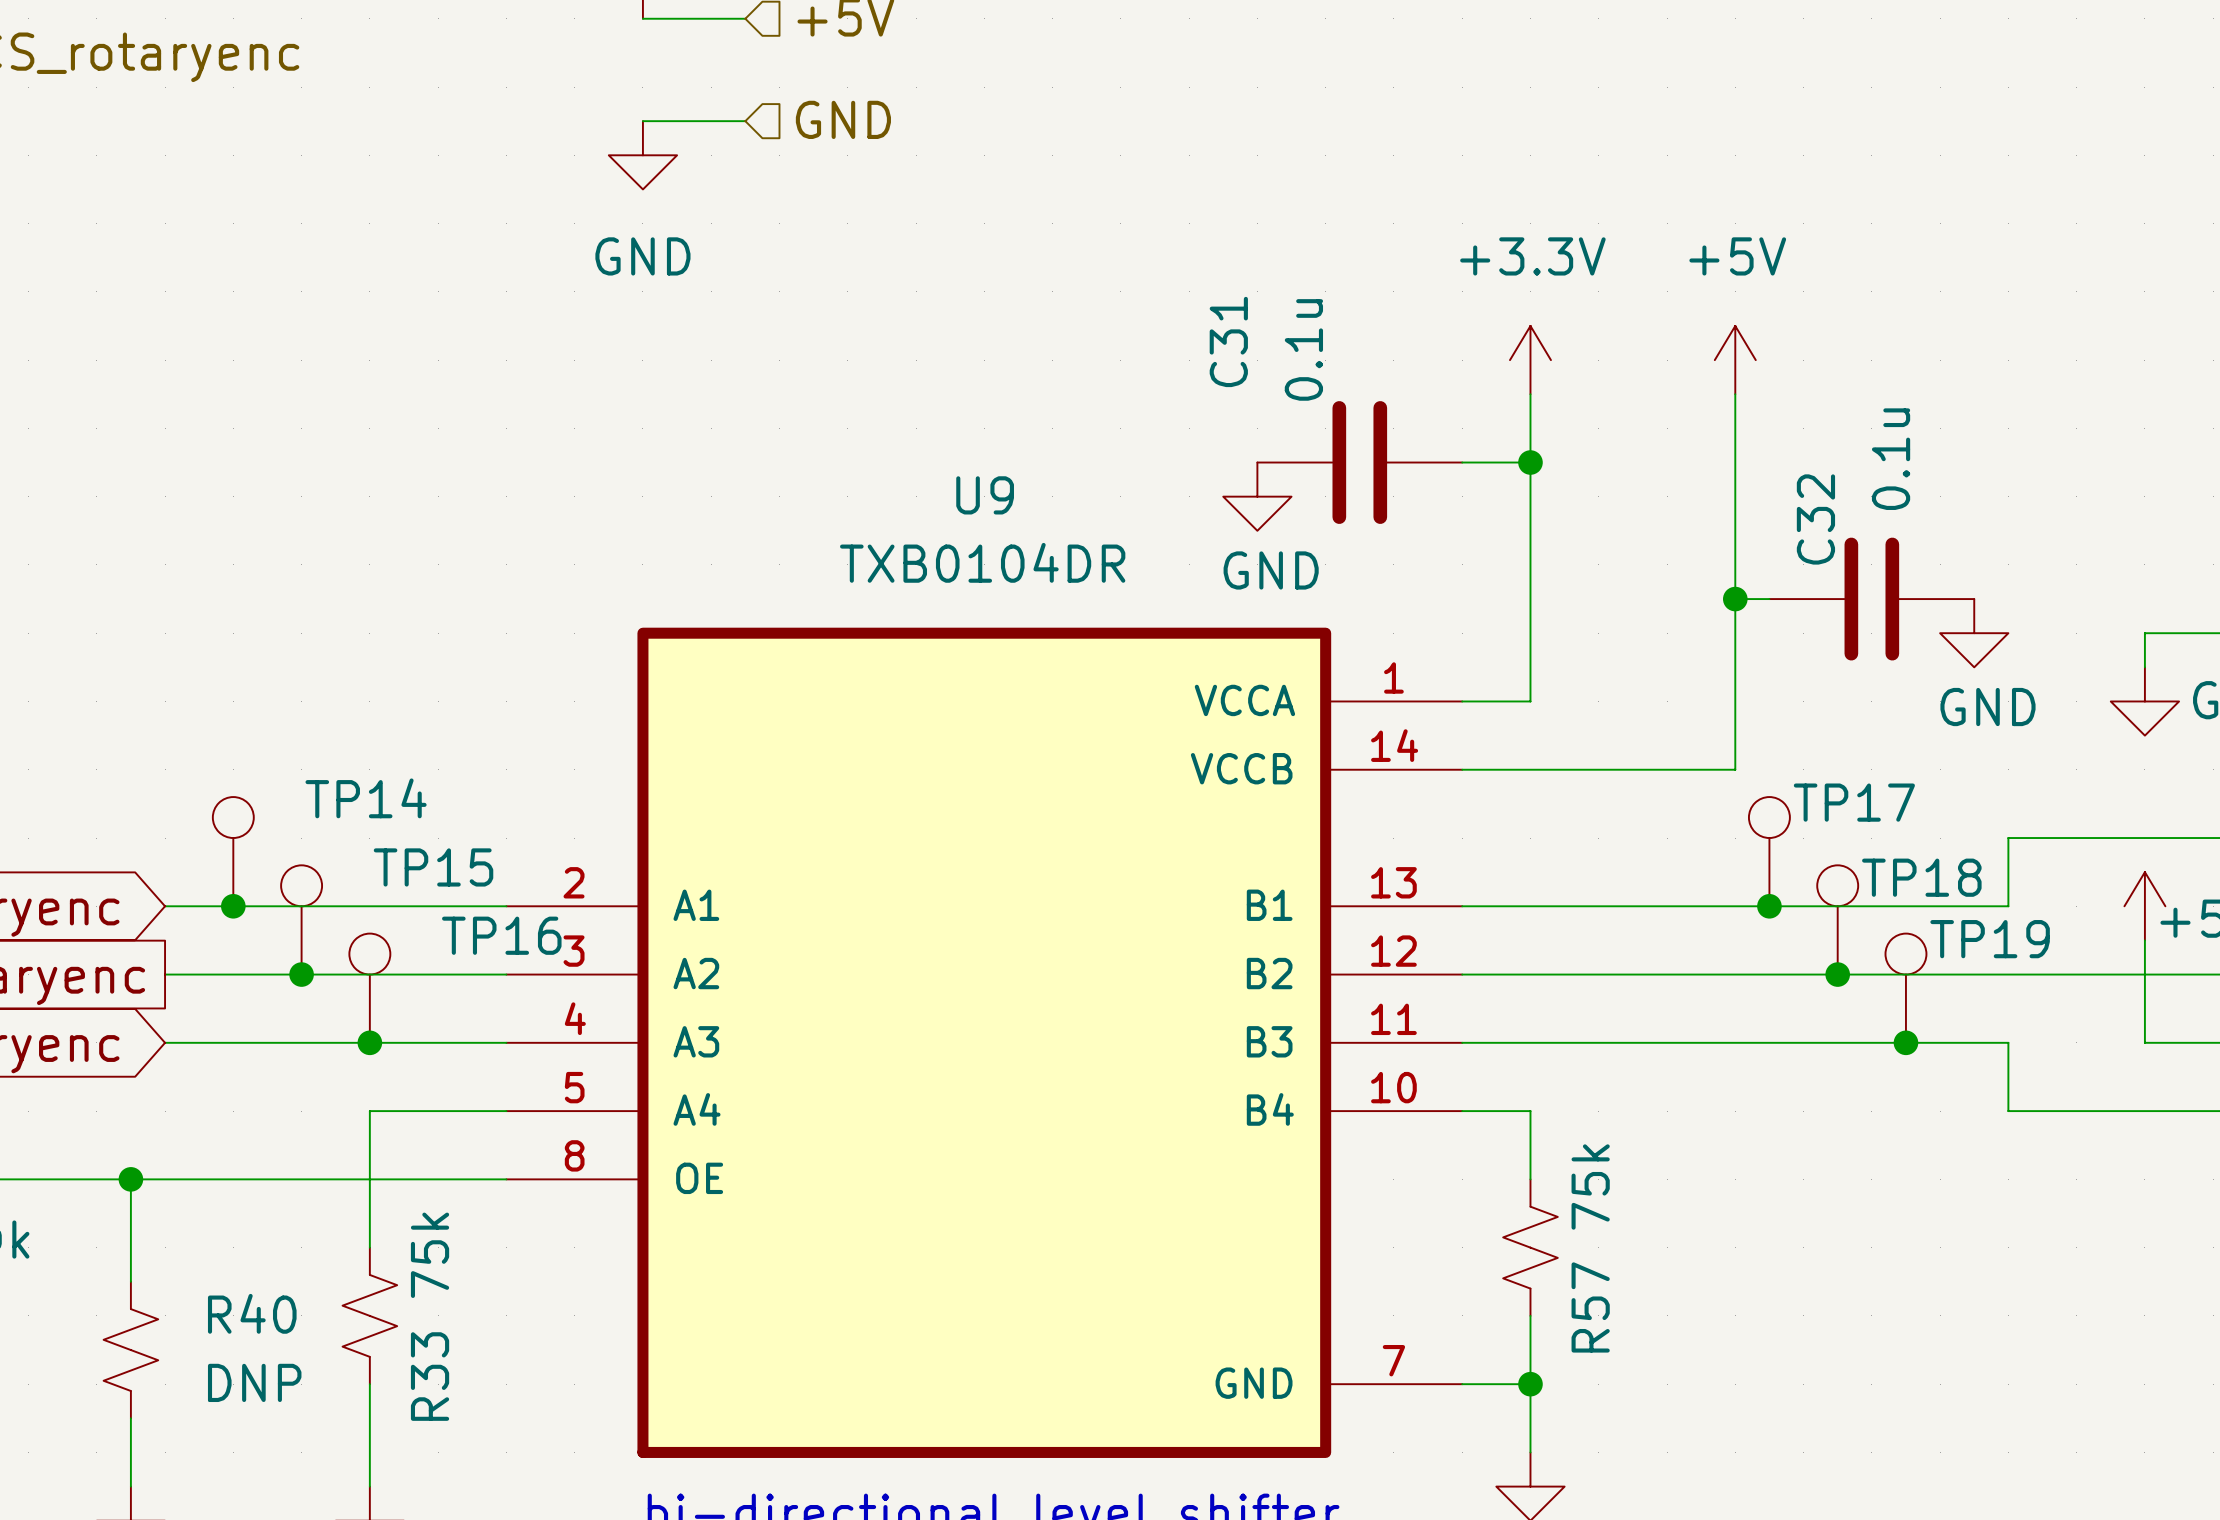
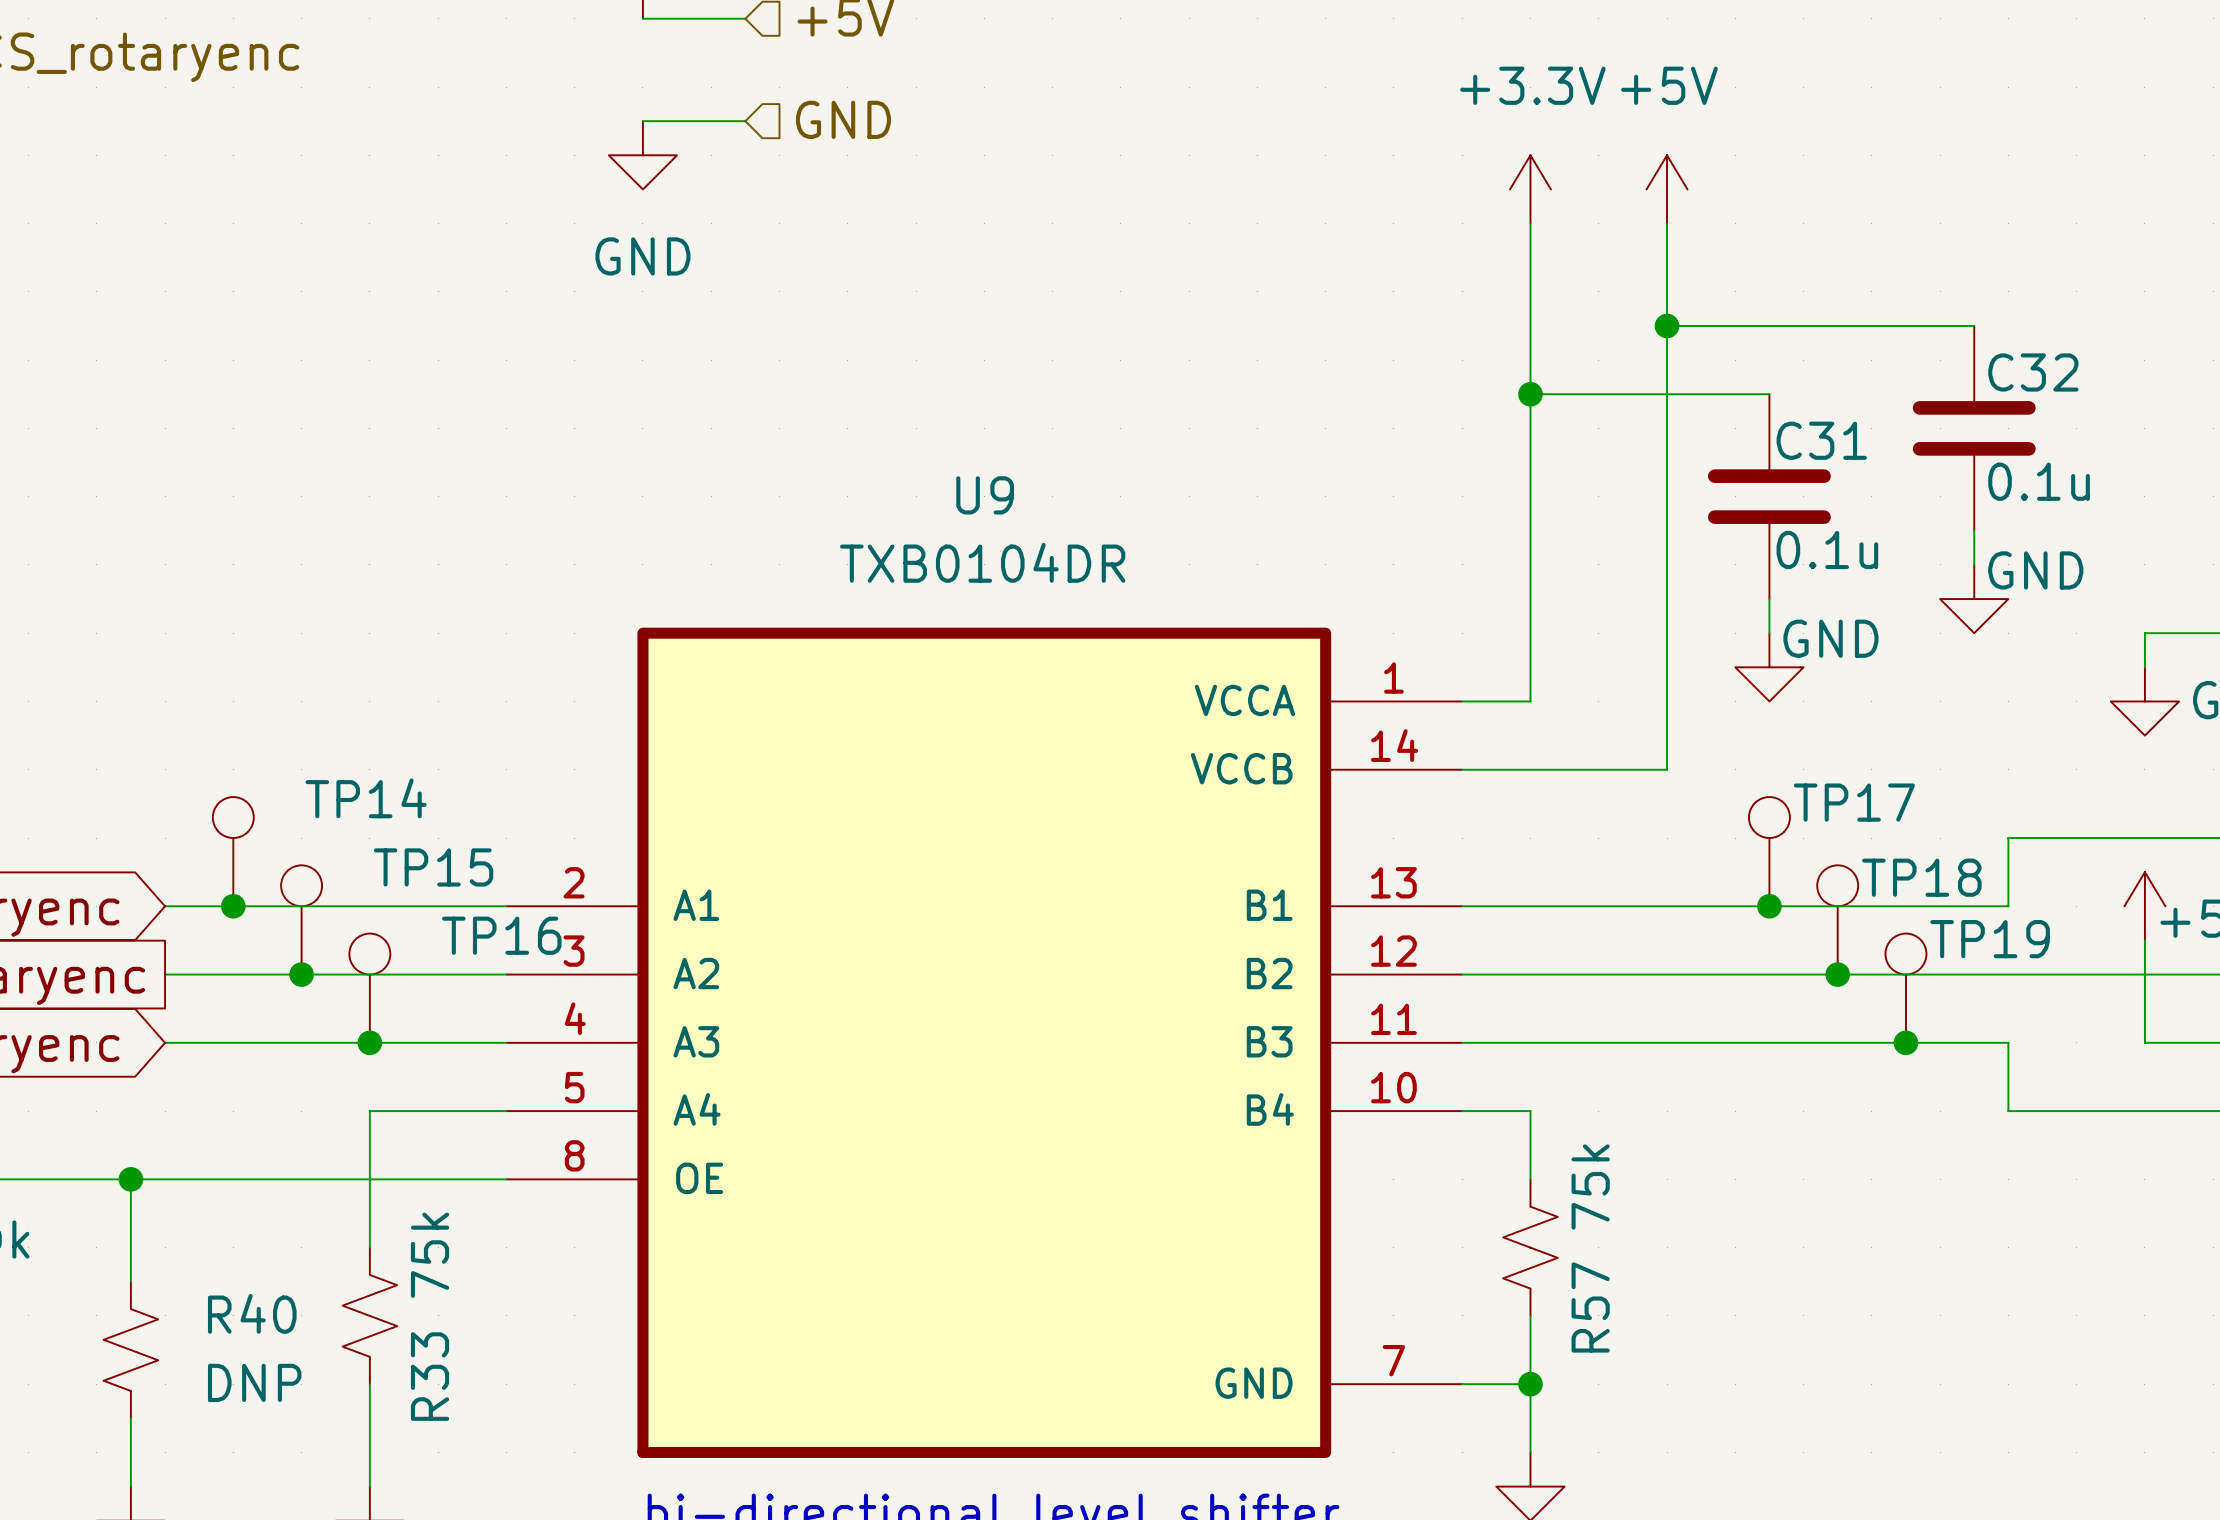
wire: none -> (1530, 223) (1530, 394) (1769, 394)
wire: none -> (1667, 325) (1974, 325)
junction: none -> (1667, 325)
C31 name position: C31 (1228, 341) -> C31 (1821, 440)
C31 value position: 0.1u (1303, 349) -> 0.1u (1827, 549)
power symbol position: +3.3V (1530, 360) -> +3.3V (1530, 189)
power symbol position: +5V (1735, 360) -> +5V (1667, 189)
wire: (1735, 394) (1735, 769) (1667, 769) -> (1667, 223) (1667, 769)
C32 value position: 0.1u (1891, 459) -> 0.1u (2039, 481)
C31 rotation: 0° (1359, 462) -> 90° clockwise (1769, 496)
C31 position: (1359, 462) -> (1769, 496)
wire: (1462, 462) (1530, 462) -> none
junction position: (1530, 462) -> (1530, 394)
power symbol: GND (1257, 496) -> none
wire: none -> (1974, 530) (1974, 564)
wire: (1735, 599) (1769, 599) -> (1769, 633) (1769, 599)
junction: (1735, 599) -> none
C32 rotation: 0° (1871, 599) -> 90° clockwise (1974, 428)
C32 position: (1871, 599) -> (1974, 428)
power symbol position: GND (1974, 633) -> GND (1974, 599)
power symbol: none -> GND (1769, 667)
power symbol text position: GND (1987, 707) -> GND (2035, 570)

